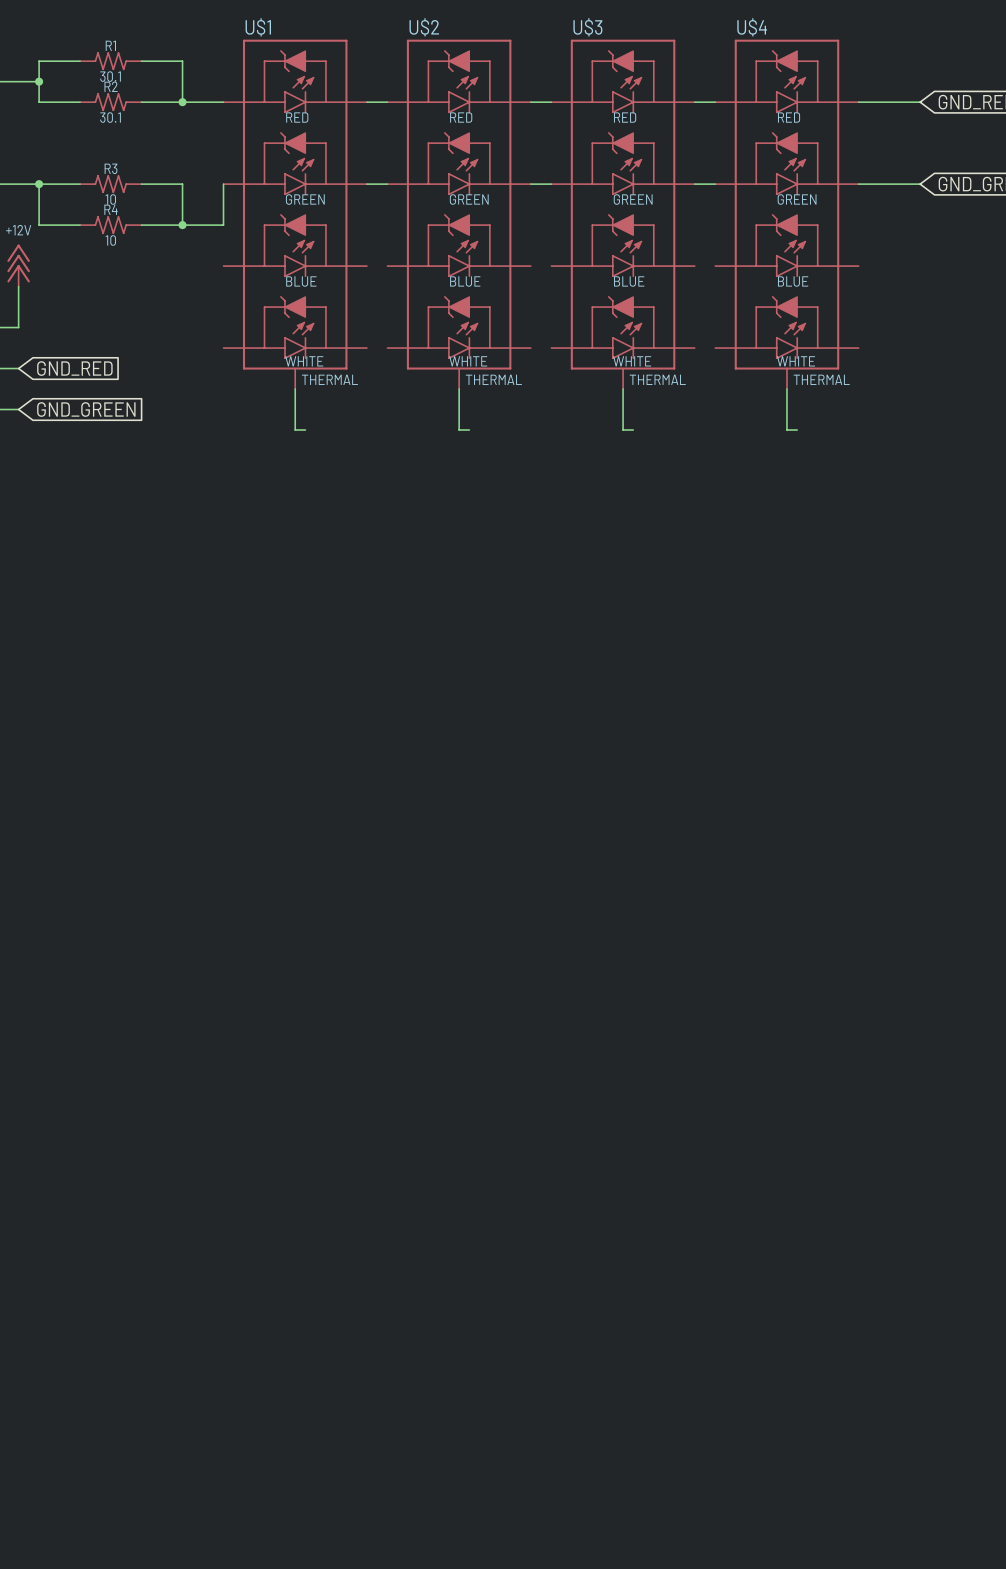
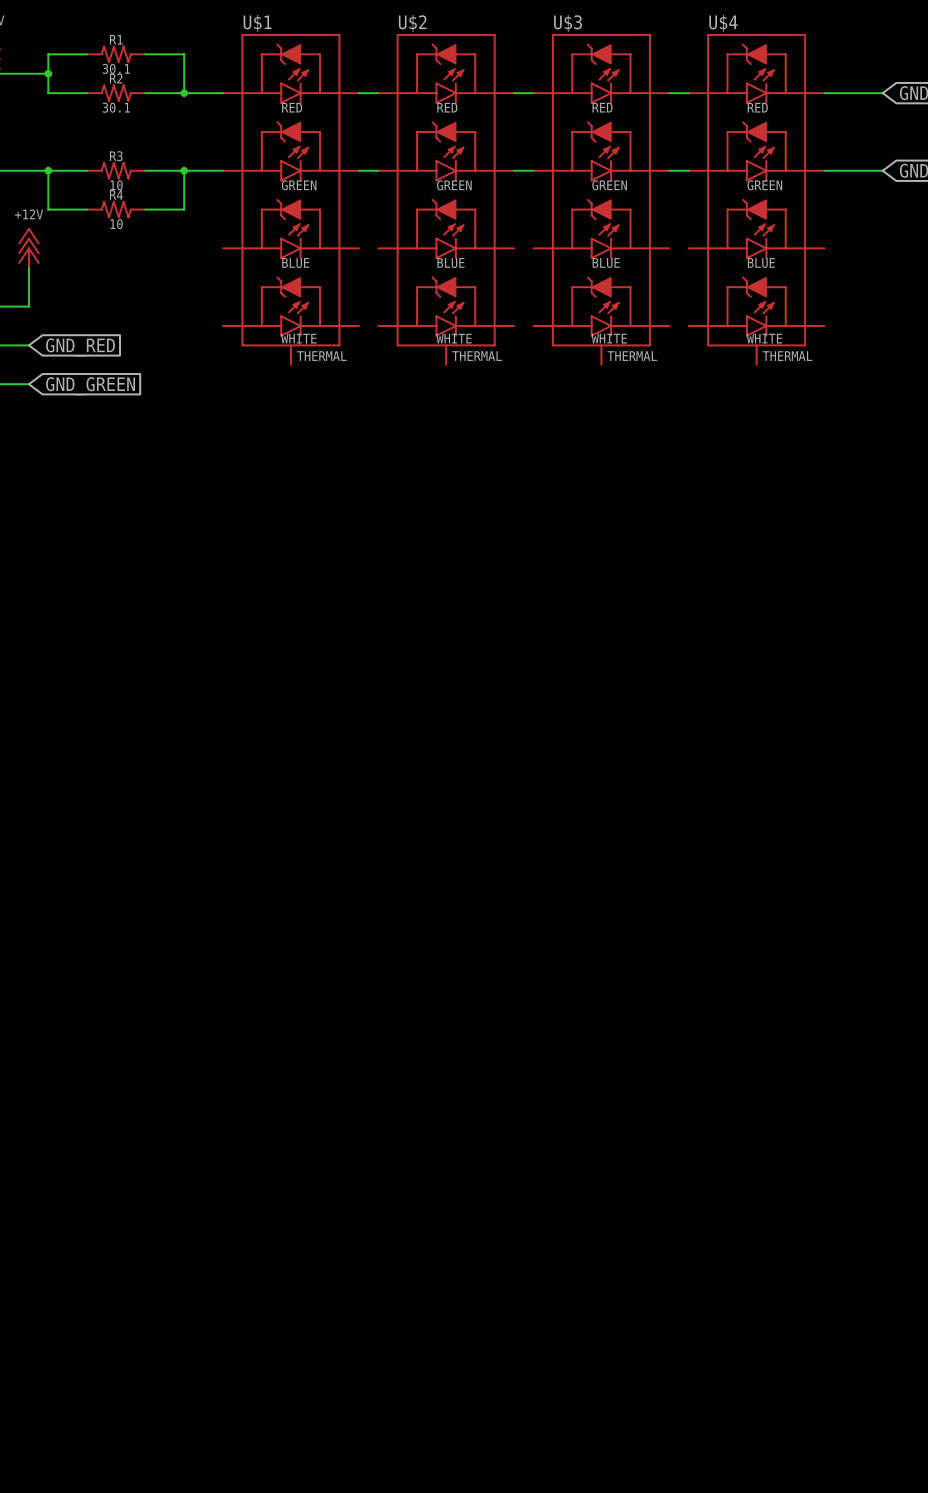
wire: (223, 184) (223, 225) (182, 225) -> (223, 170) (184, 170)
junction position: (182, 225) -> (184, 170)
wire: (295, 389) (295, 430) (305, 430) -> none
wire: (459, 389) (459, 430) (469, 430) -> none
wire: (623, 389) (623, 430) (633, 430) -> none
wire: (786, 389) (786, 430) (797, 430) -> none

